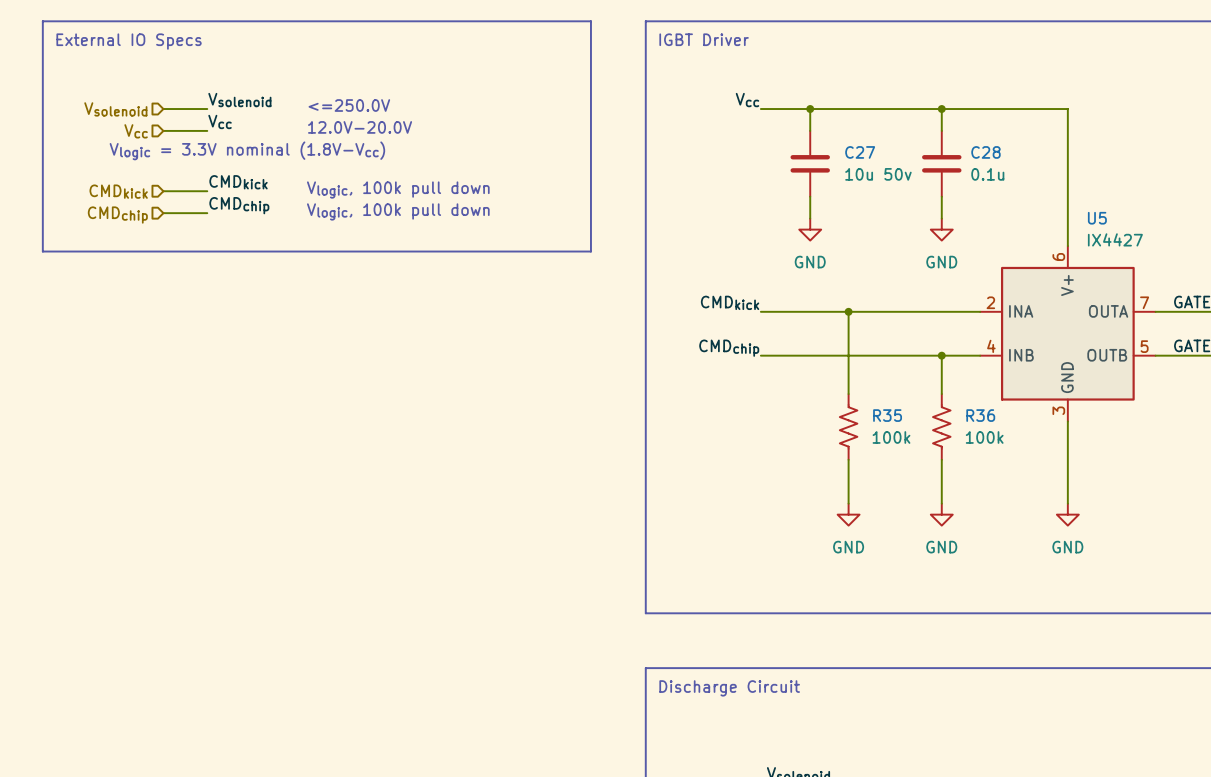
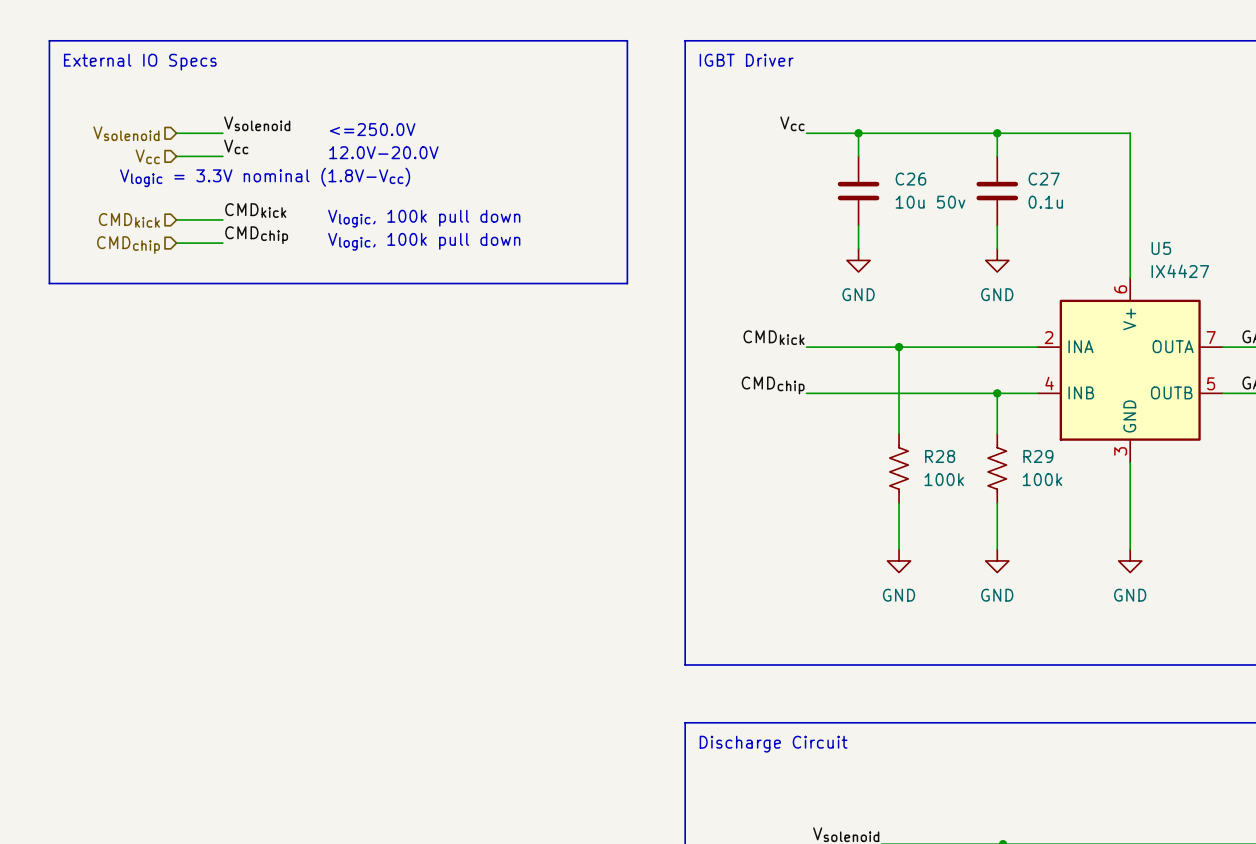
C27 name: C27 (860, 152) -> C26 (910, 179)
C28 name: C28 (985, 152) -> C27 (1044, 179)
R35 name: R35 (887, 415) -> R28 (940, 456)
R36 name: R36 (980, 415) -> R29 (1038, 456)

